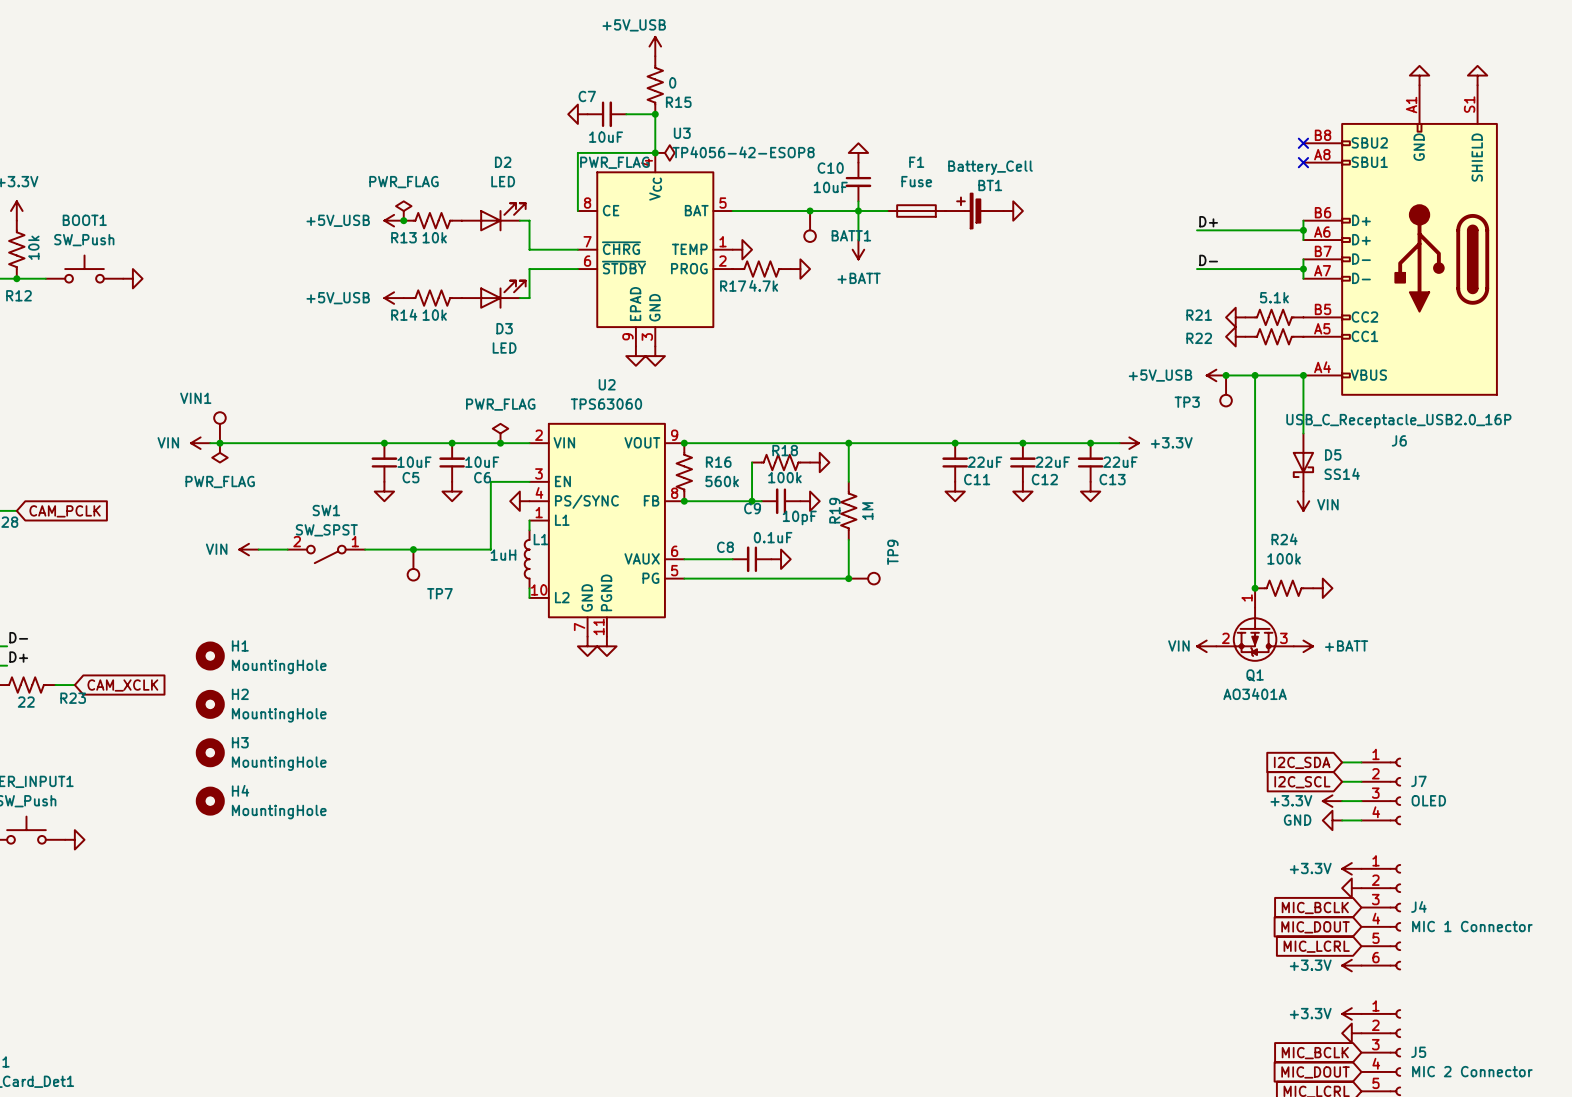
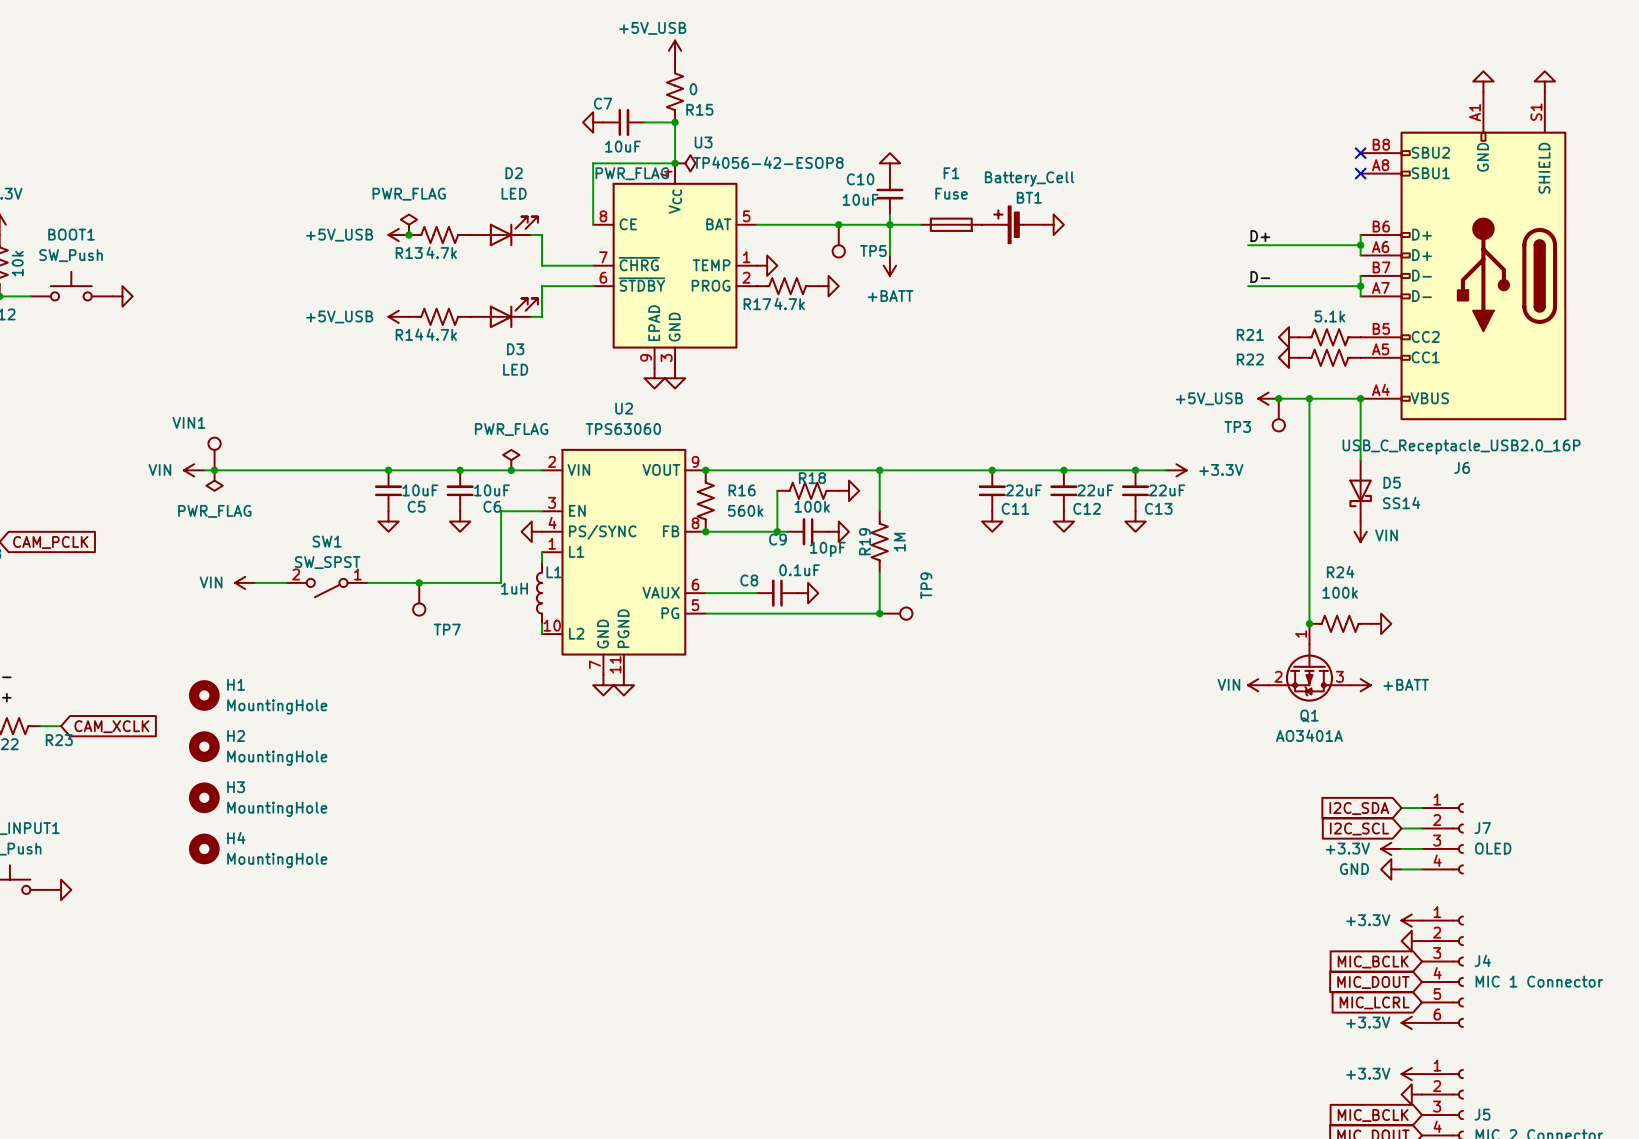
BATT1 name: BATT1 (851, 235) -> TP5 (873, 250)
R13 value: 10k (434, 237) -> 4.7k (441, 252)
R14 value: 10k (434, 315) -> 4.7k (441, 334)

